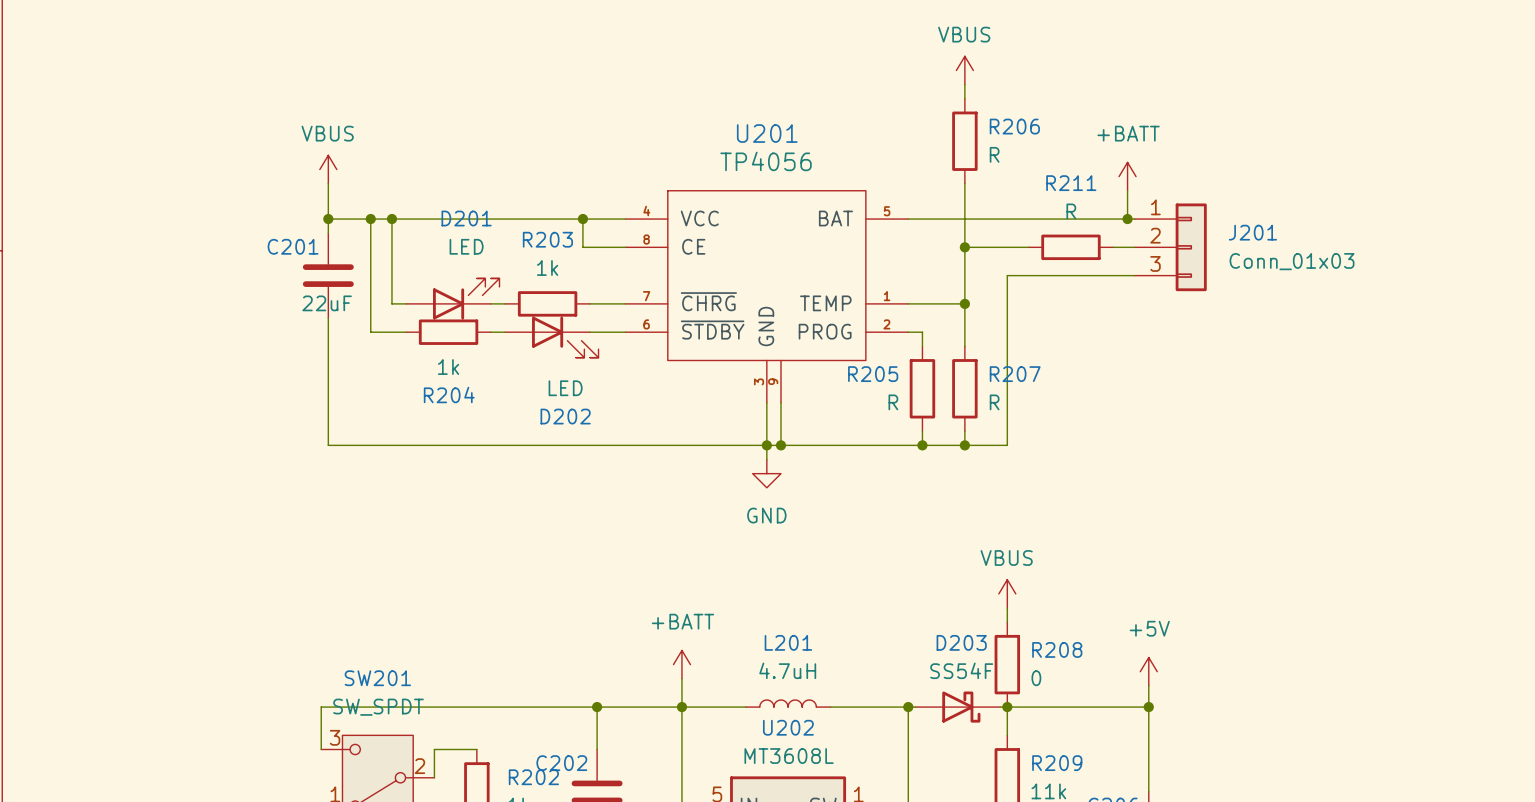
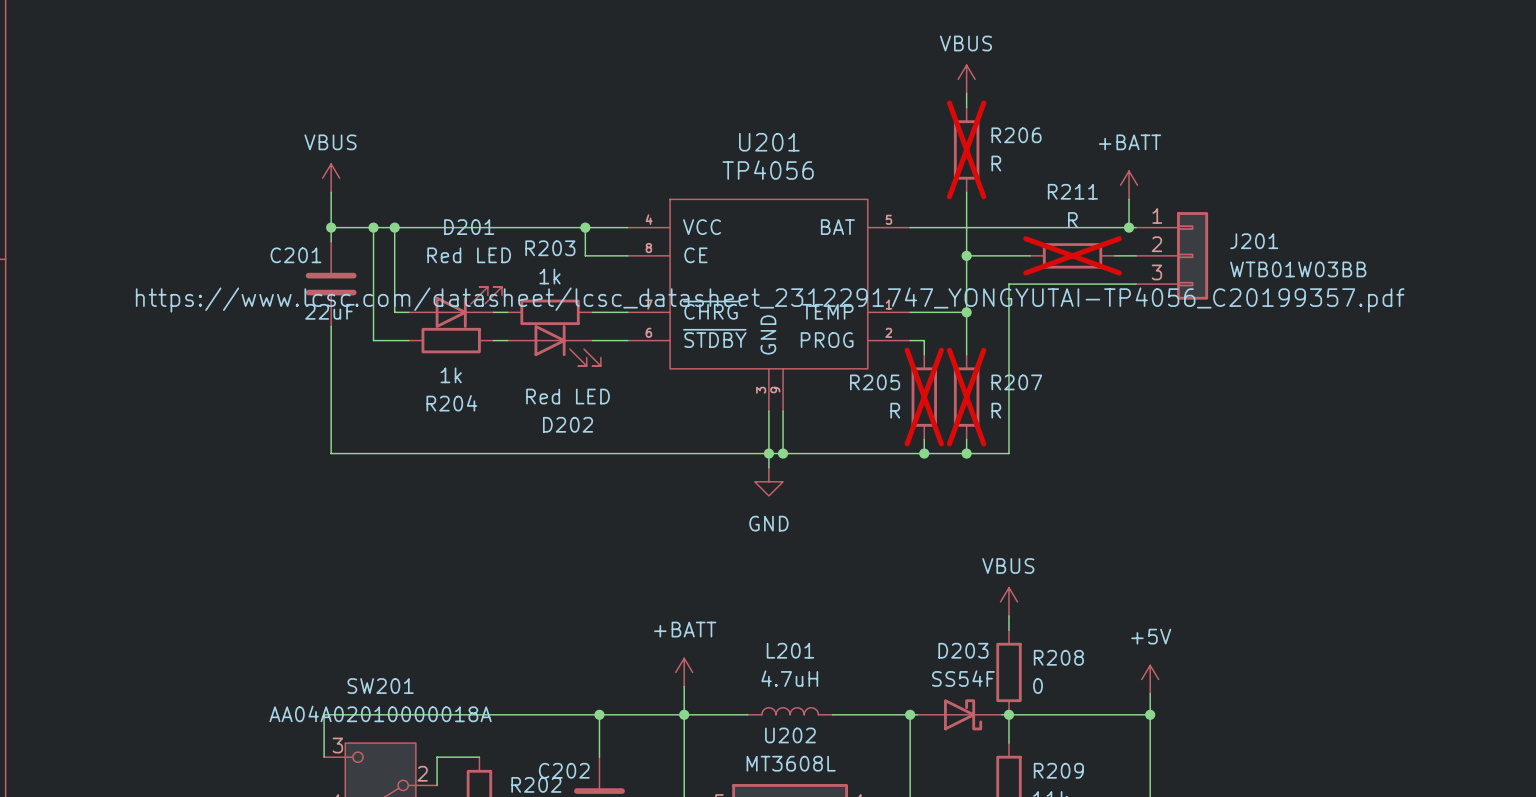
R206 do-not-place cross: none -> (966, 149)
D201 value: LED (466, 246) -> Red LED (469, 255)
R211 do-not-place cross: none -> (1072, 255)
J201 value: Conn_01x03 (1292, 261) -> WTB01W03BB (1298, 269)
U201 text: none -> https://www.lcsc.com/datasheet/lcsc_datasheet_2312291747_YONGYUTAI-TP4056_C20199357.pdf (770, 300)
D202 value: LED (565, 388) -> Red LED (568, 396)
R205 do-not-place cross: none -> (924, 397)
R207 do-not-place cross: none -> (966, 397)
SW201 value: SW_SPDT (378, 707) -> AA04A02010000018A (380, 713)

